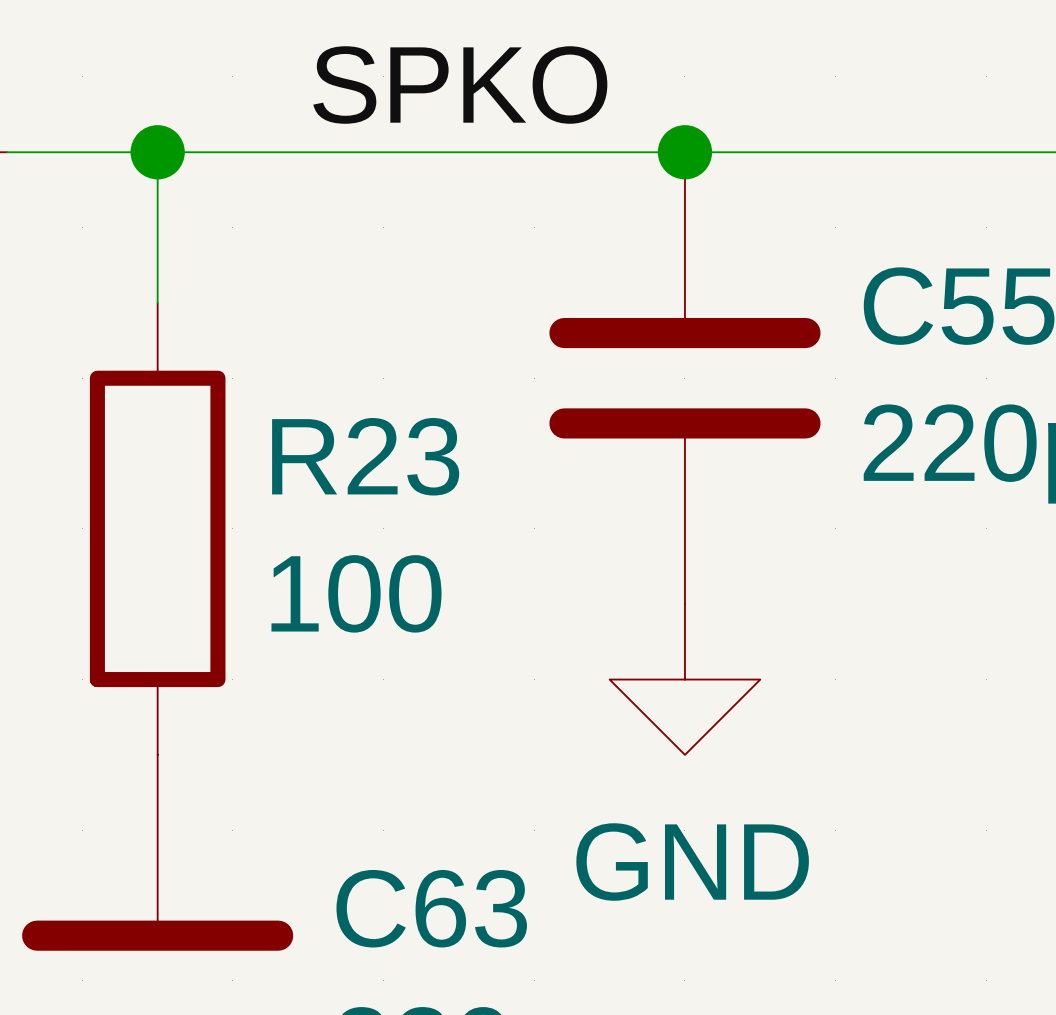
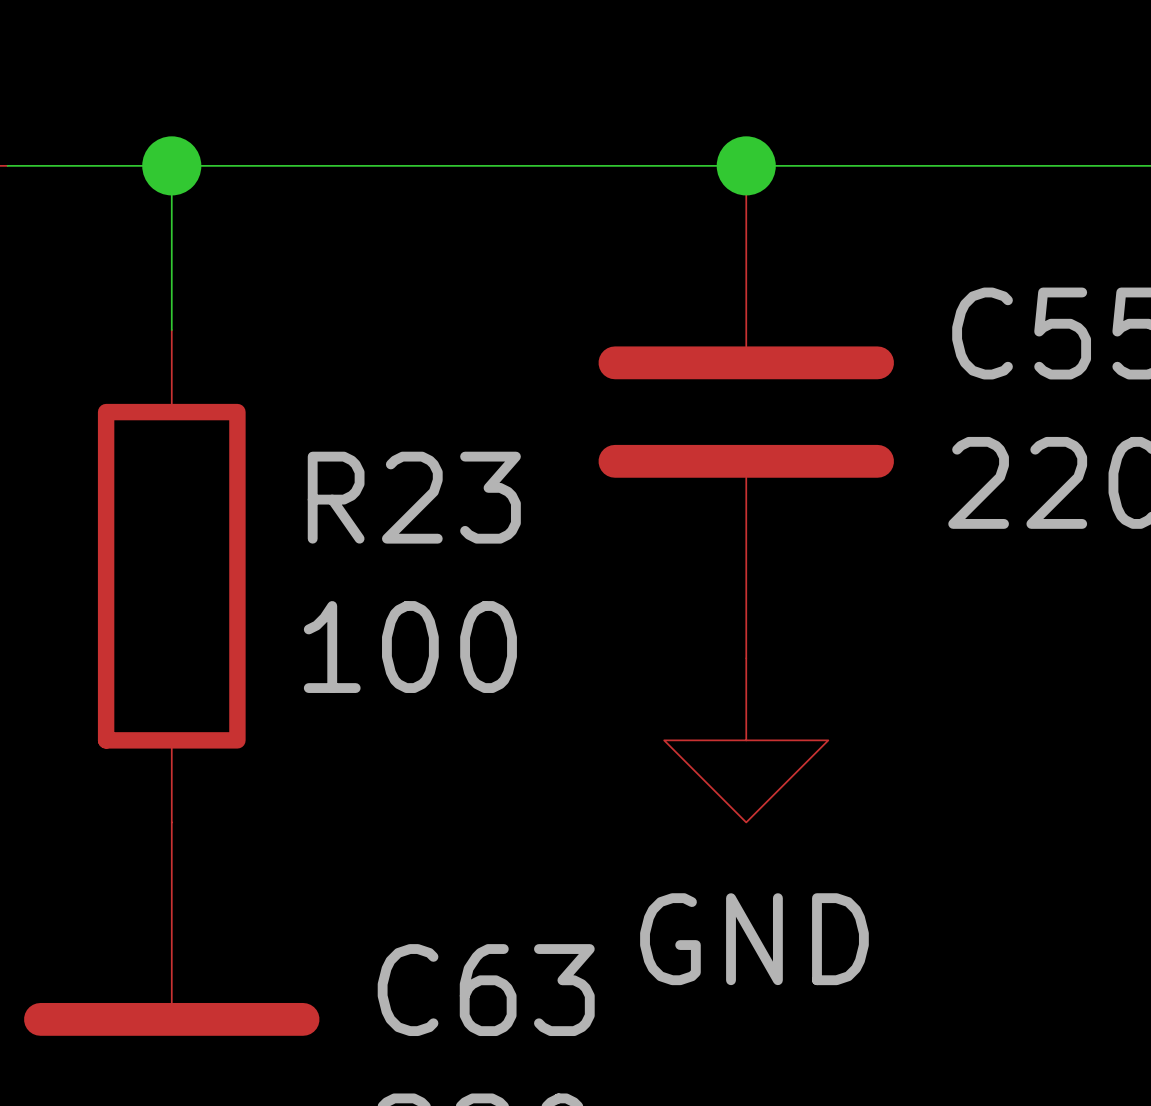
label: SPKO (460, 85) -> none

